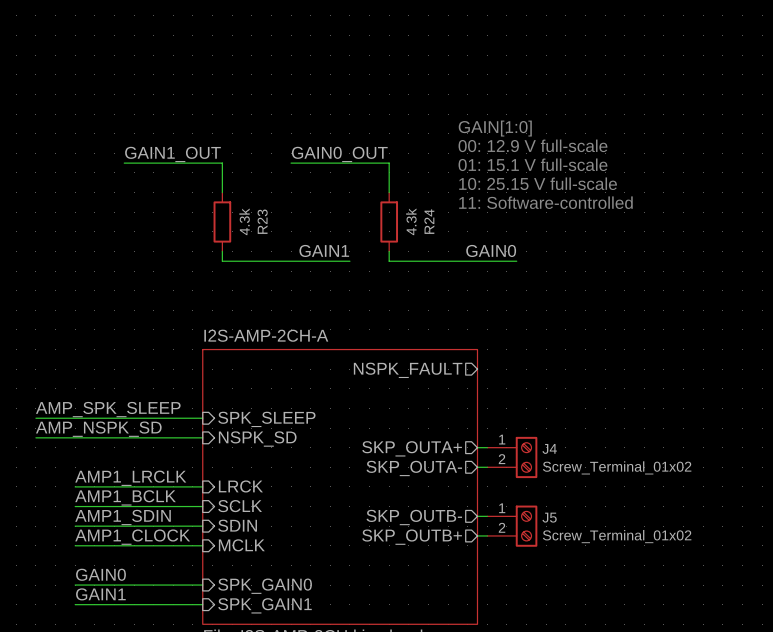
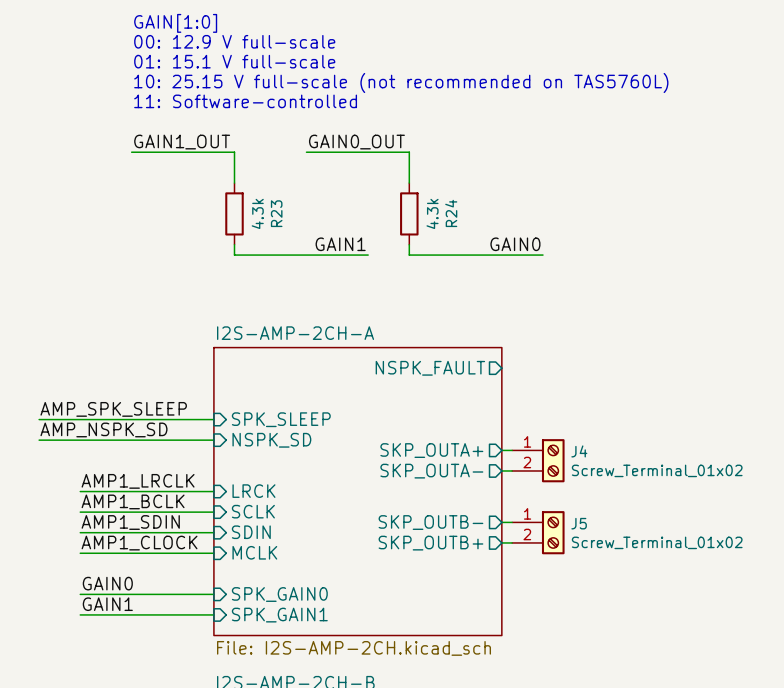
text: none -> GAIN[1:0] (175, 23)
text: none -> 00: 12.9 V full-scale (234, 41)
text: none -> 01: 15.1 V full-scale (234, 61)
text: none -> 10: 25.15 V full-scale (not recommended on TAS5760L) (401, 82)
text: none -> 11: Software-controlled (245, 101)
text: GAIN[1:0] (495, 128) -> none
text: 00: 12.9 V full-scale (532, 145) -> none
text: 01: 15.1 V full-scale (532, 164) -> none
text: 10: 25.15 V full-scale (538, 183) -> none
text: 11: Software-controlled (545, 202) -> none

